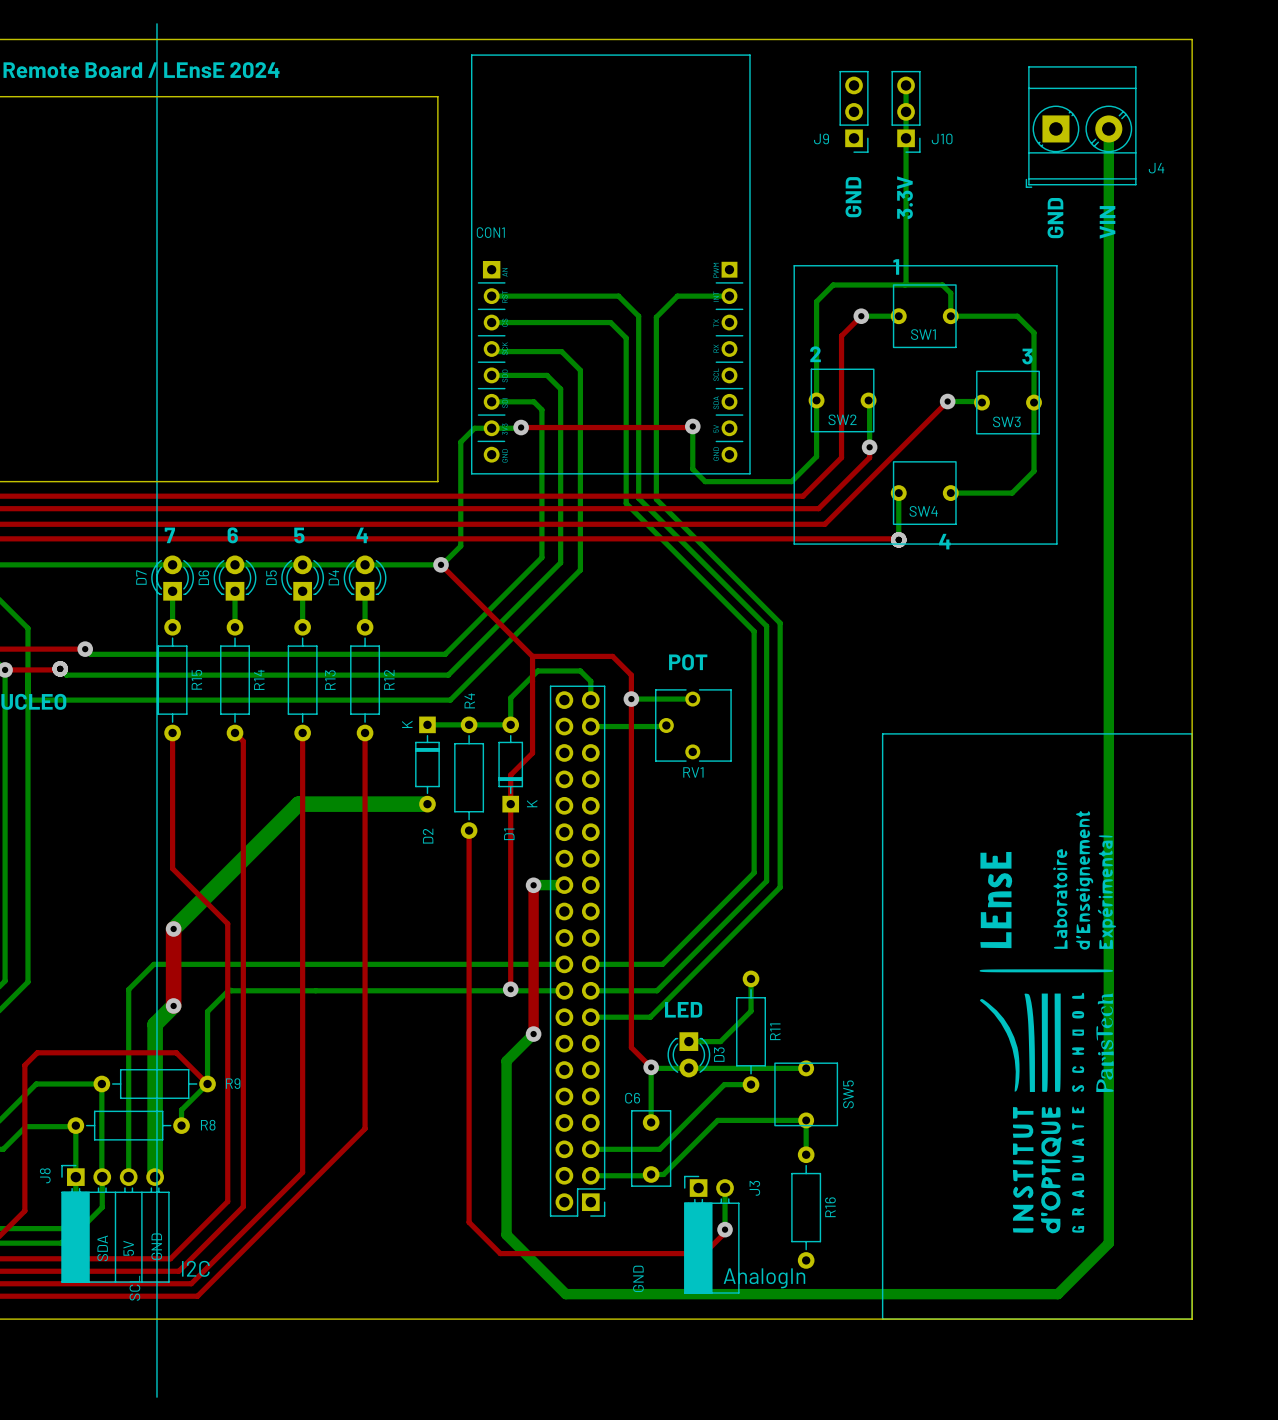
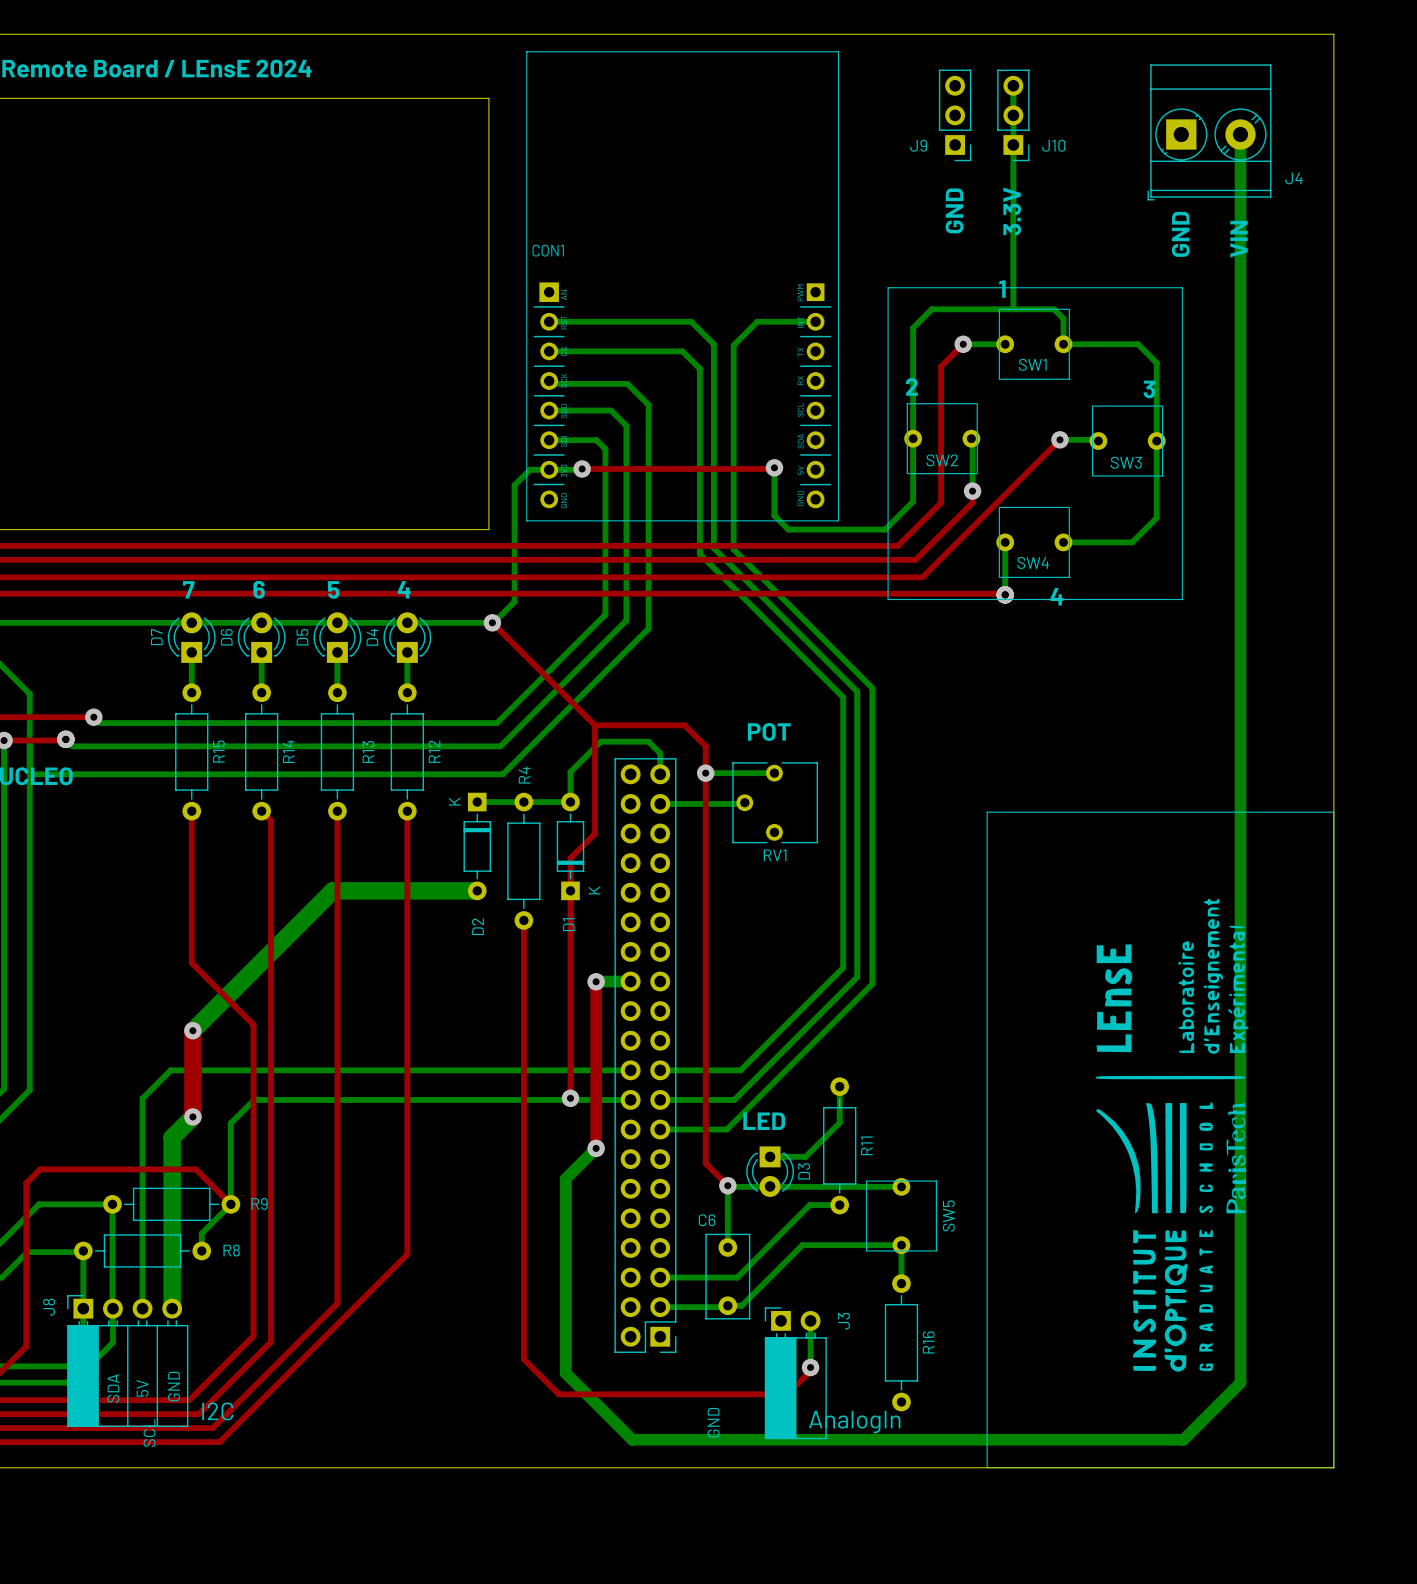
line: (156, 23) (156, 1397) -> none

